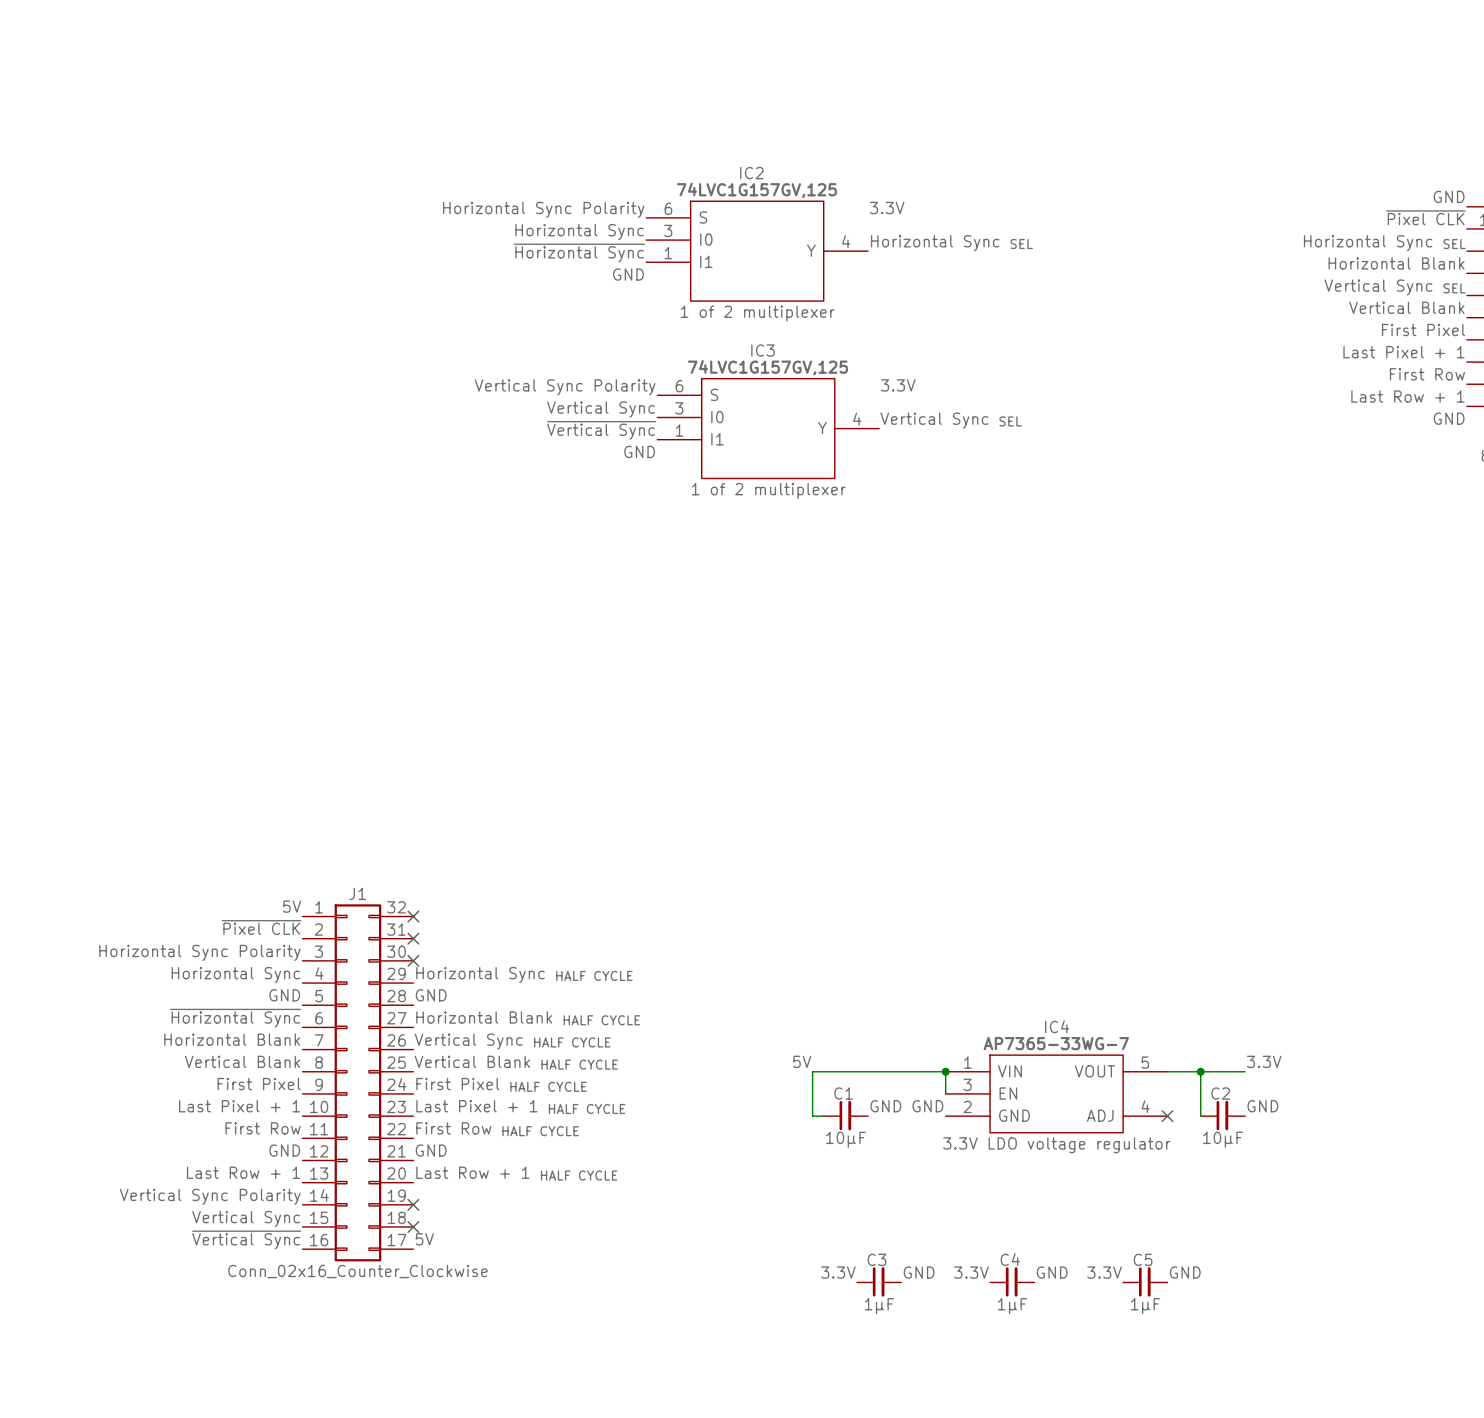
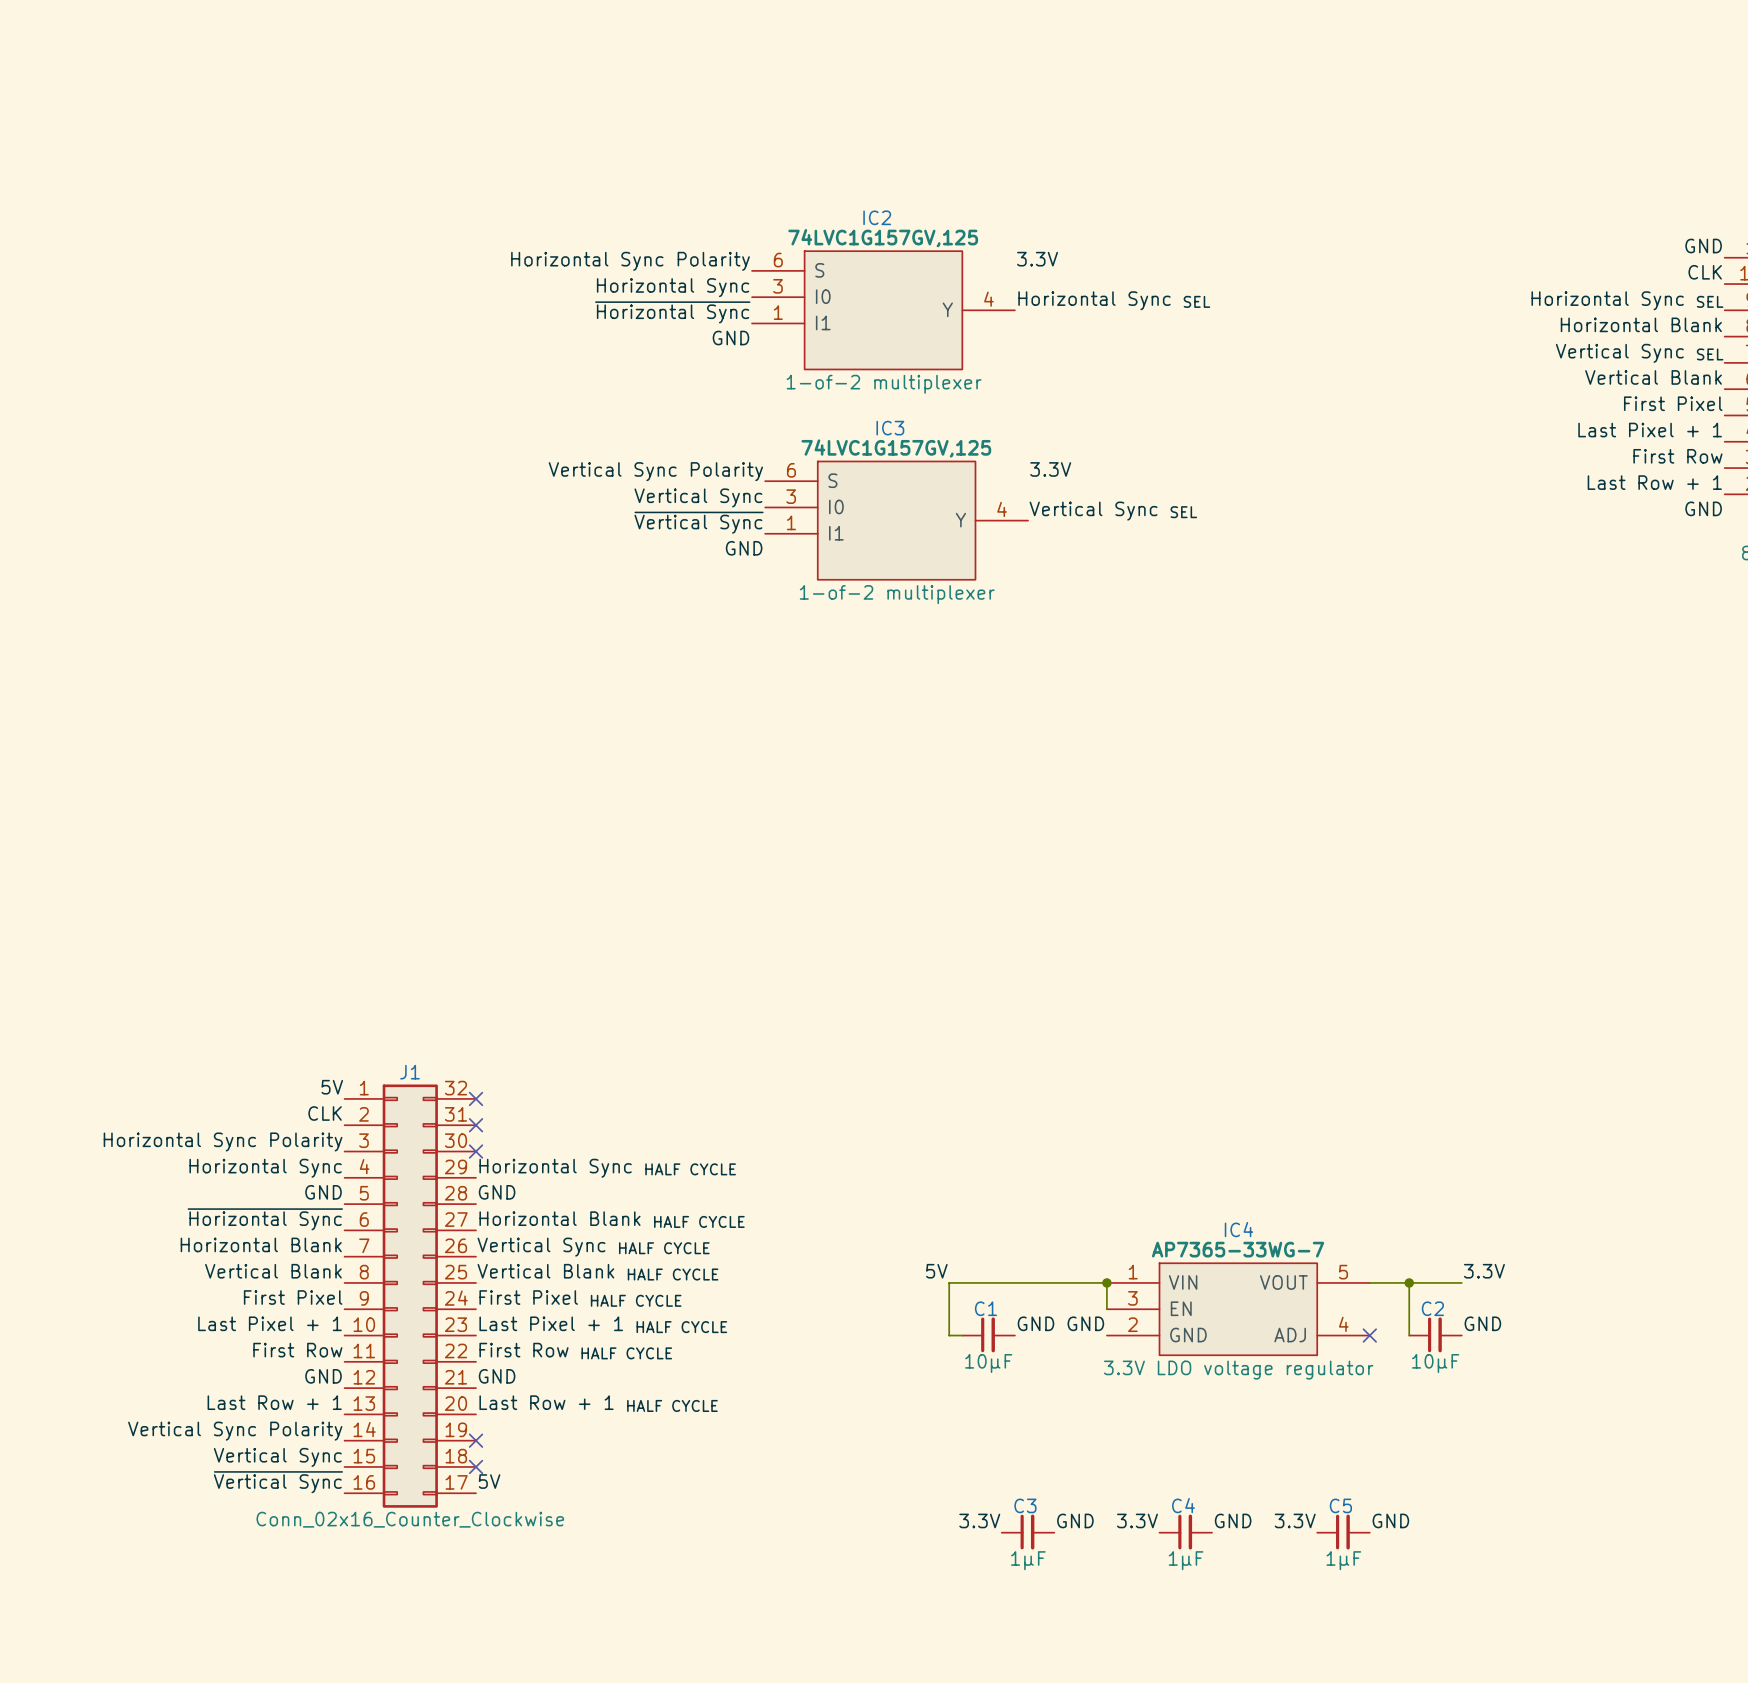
label: ~{Pixel CLK} (1425, 217) -> CLK (1705, 272)
IC2 text: 1 of 2 multiplexer (757, 313) -> 1-of-2 multiplexer (884, 384)
IC3 text: 1 of 2 multiplexer (768, 491) -> 1-of-2 multiplexer (897, 594)
label: ~{Pixel CLK} (261, 927) -> CLK (325, 1113)

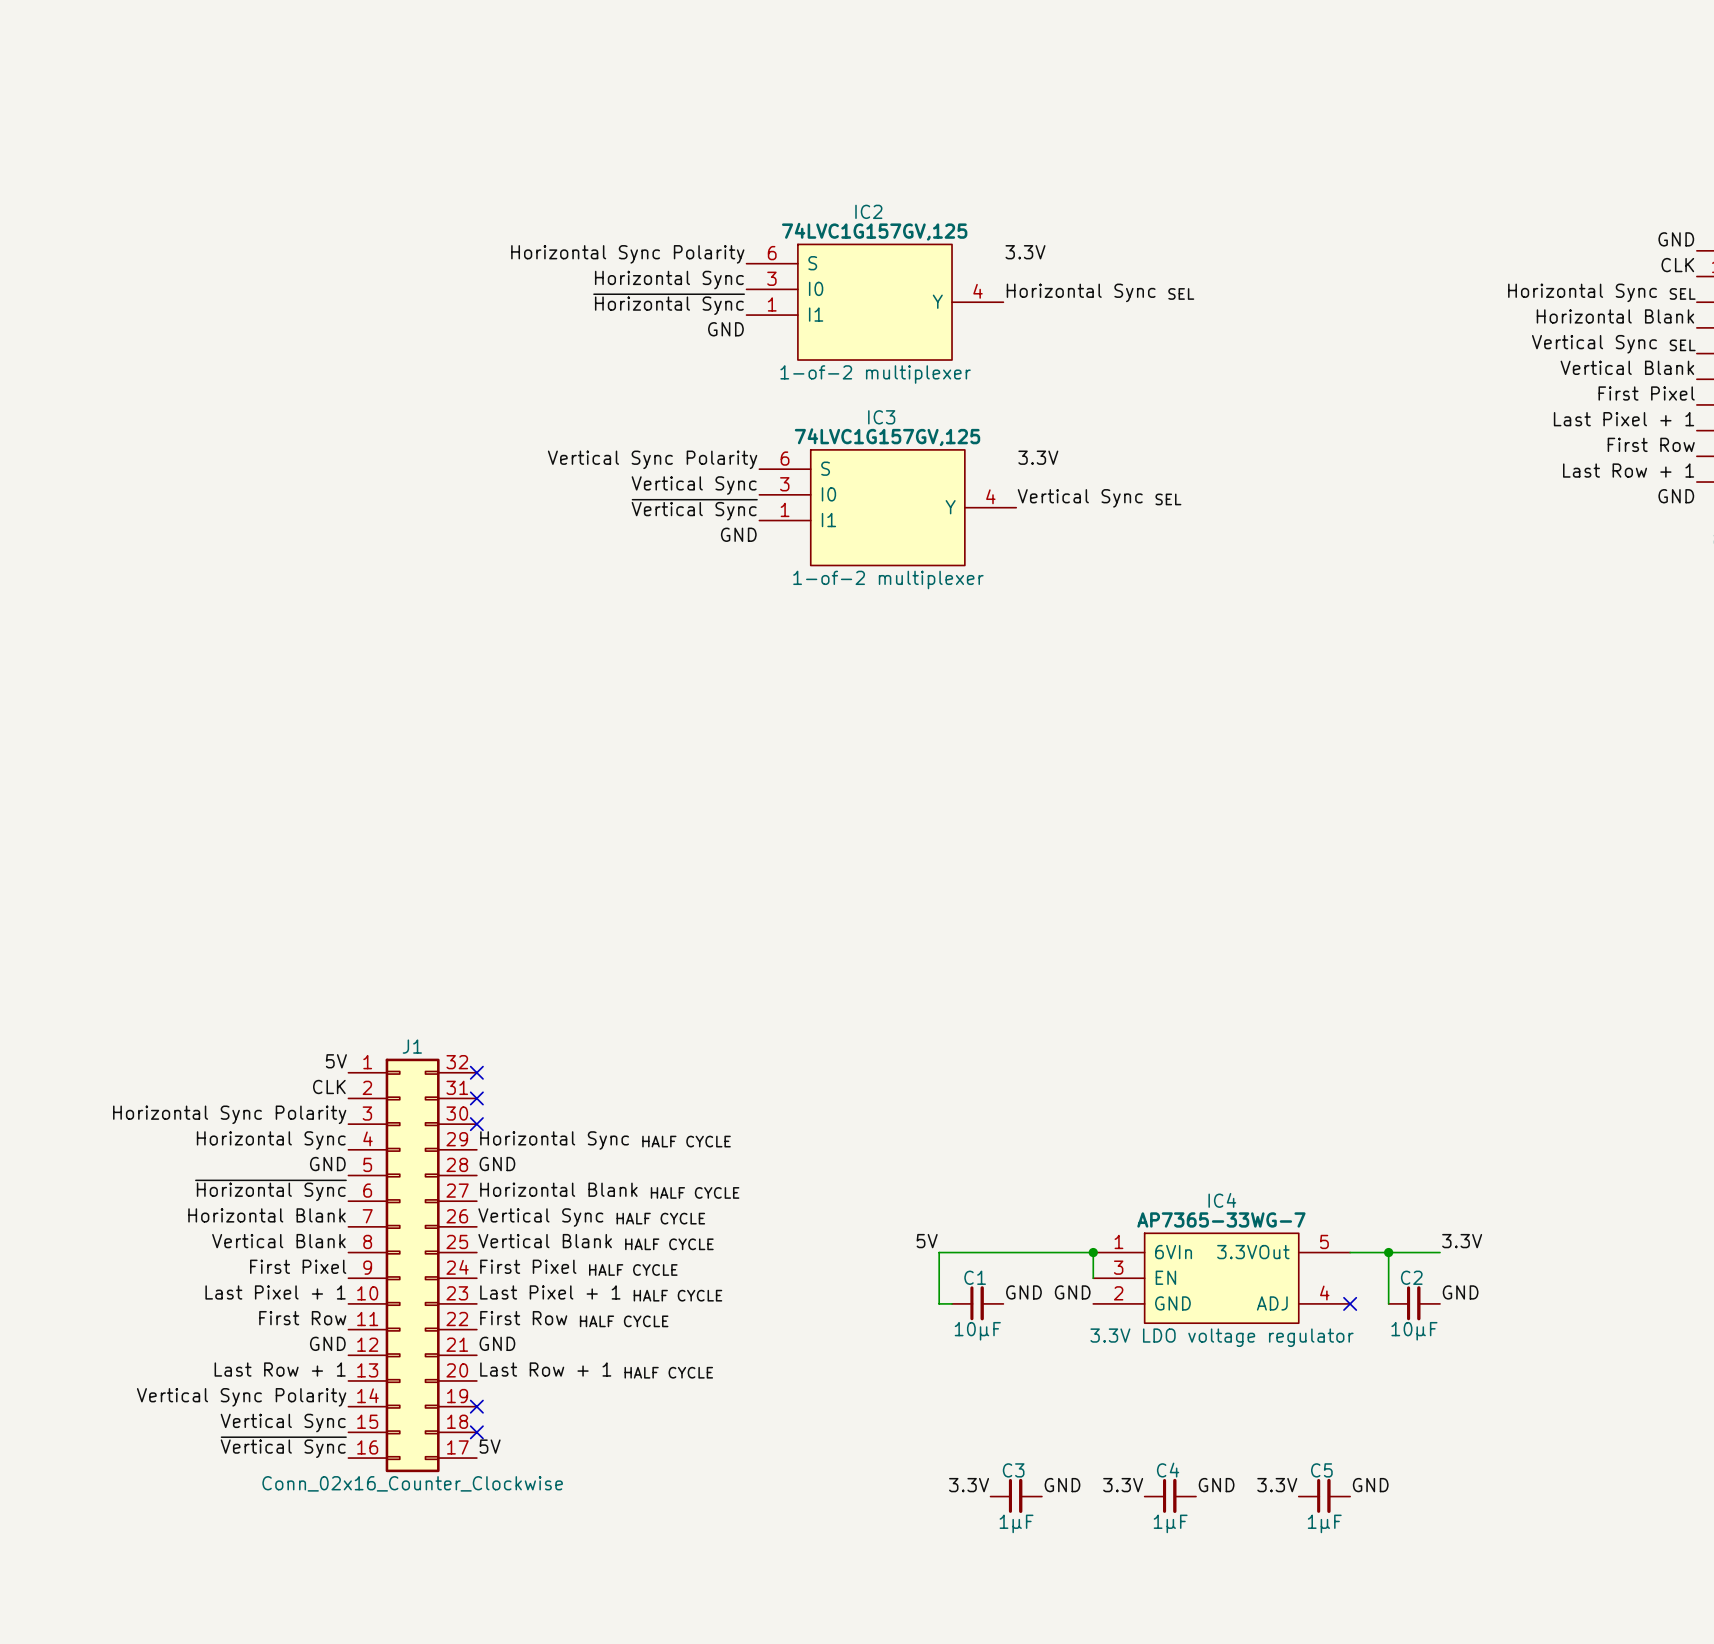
IC4 pin name: VIN (1183, 1282) -> 6VIn (1173, 1252)
IC4 pin name: VOUT (1283, 1282) -> 3.3VOut (1253, 1252)

